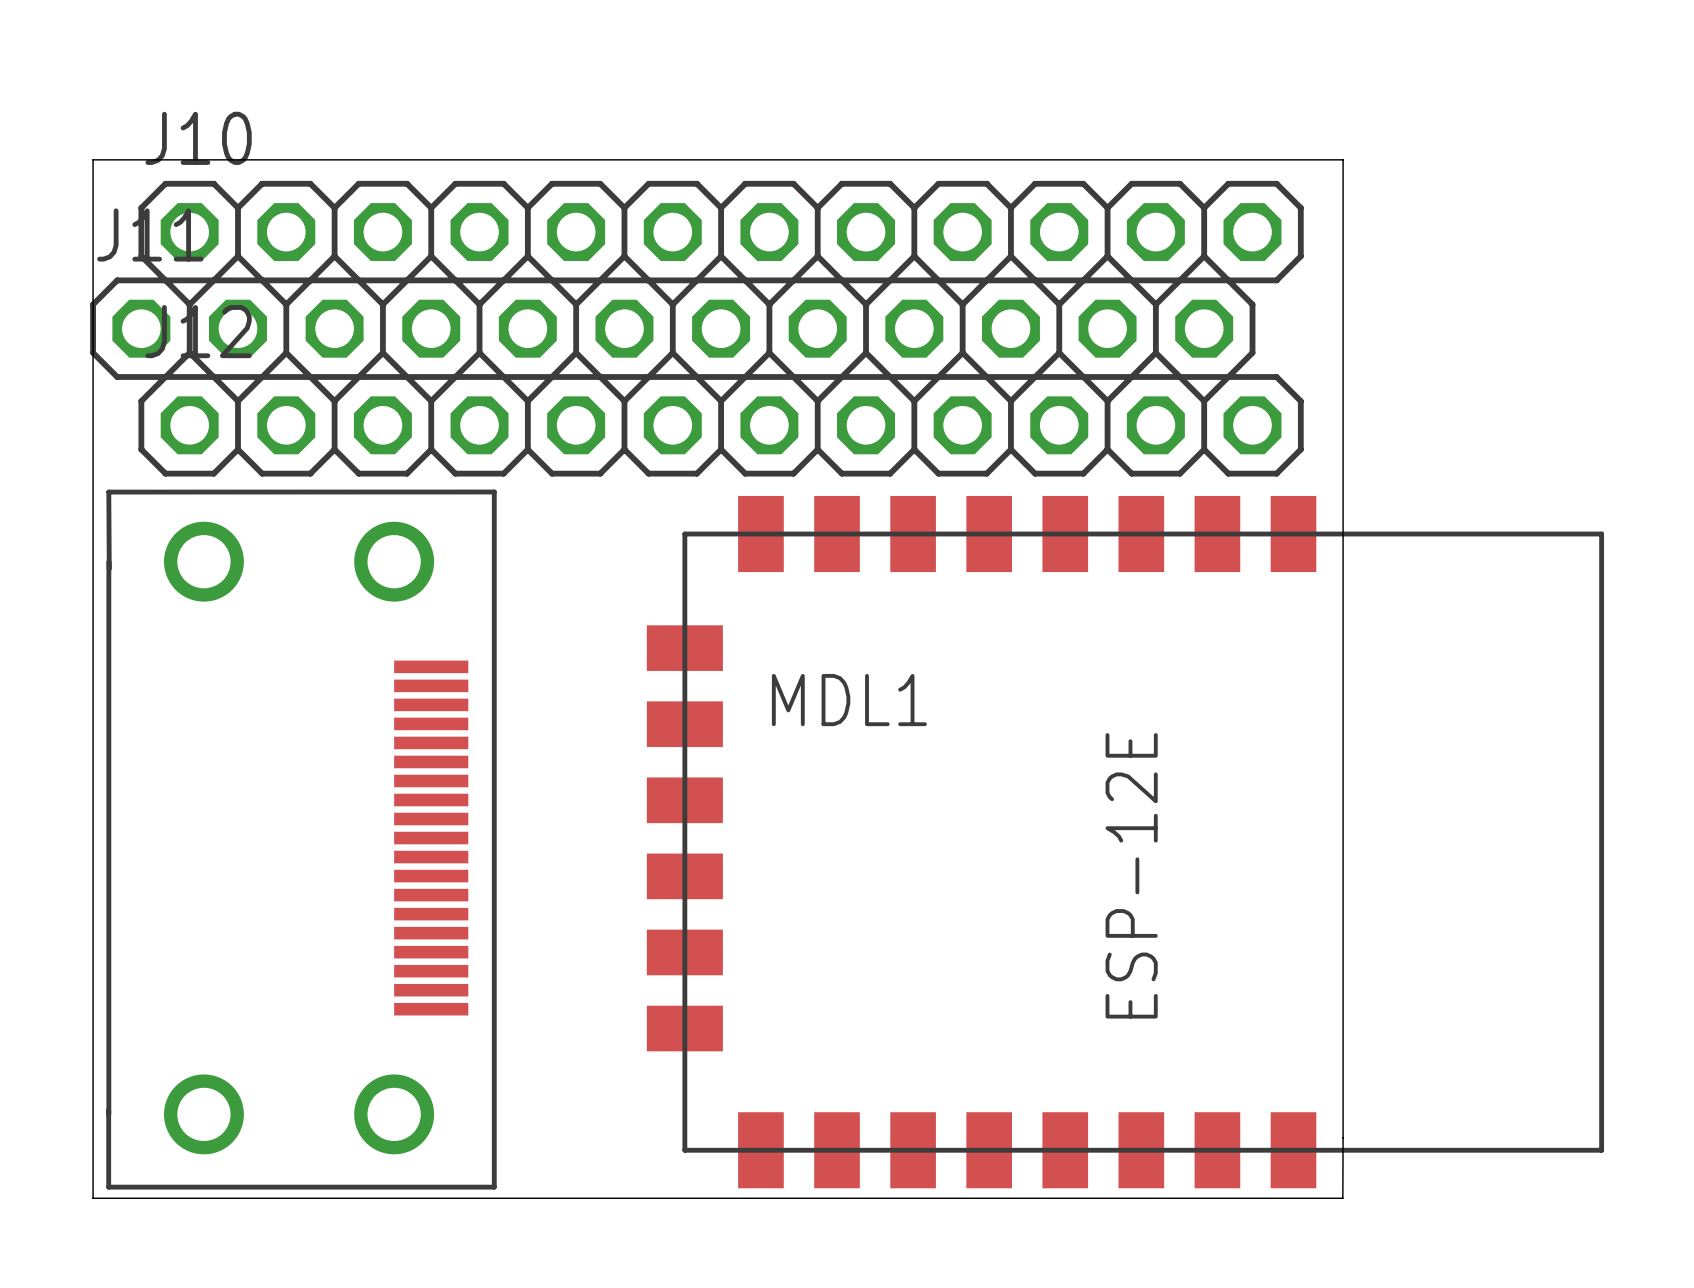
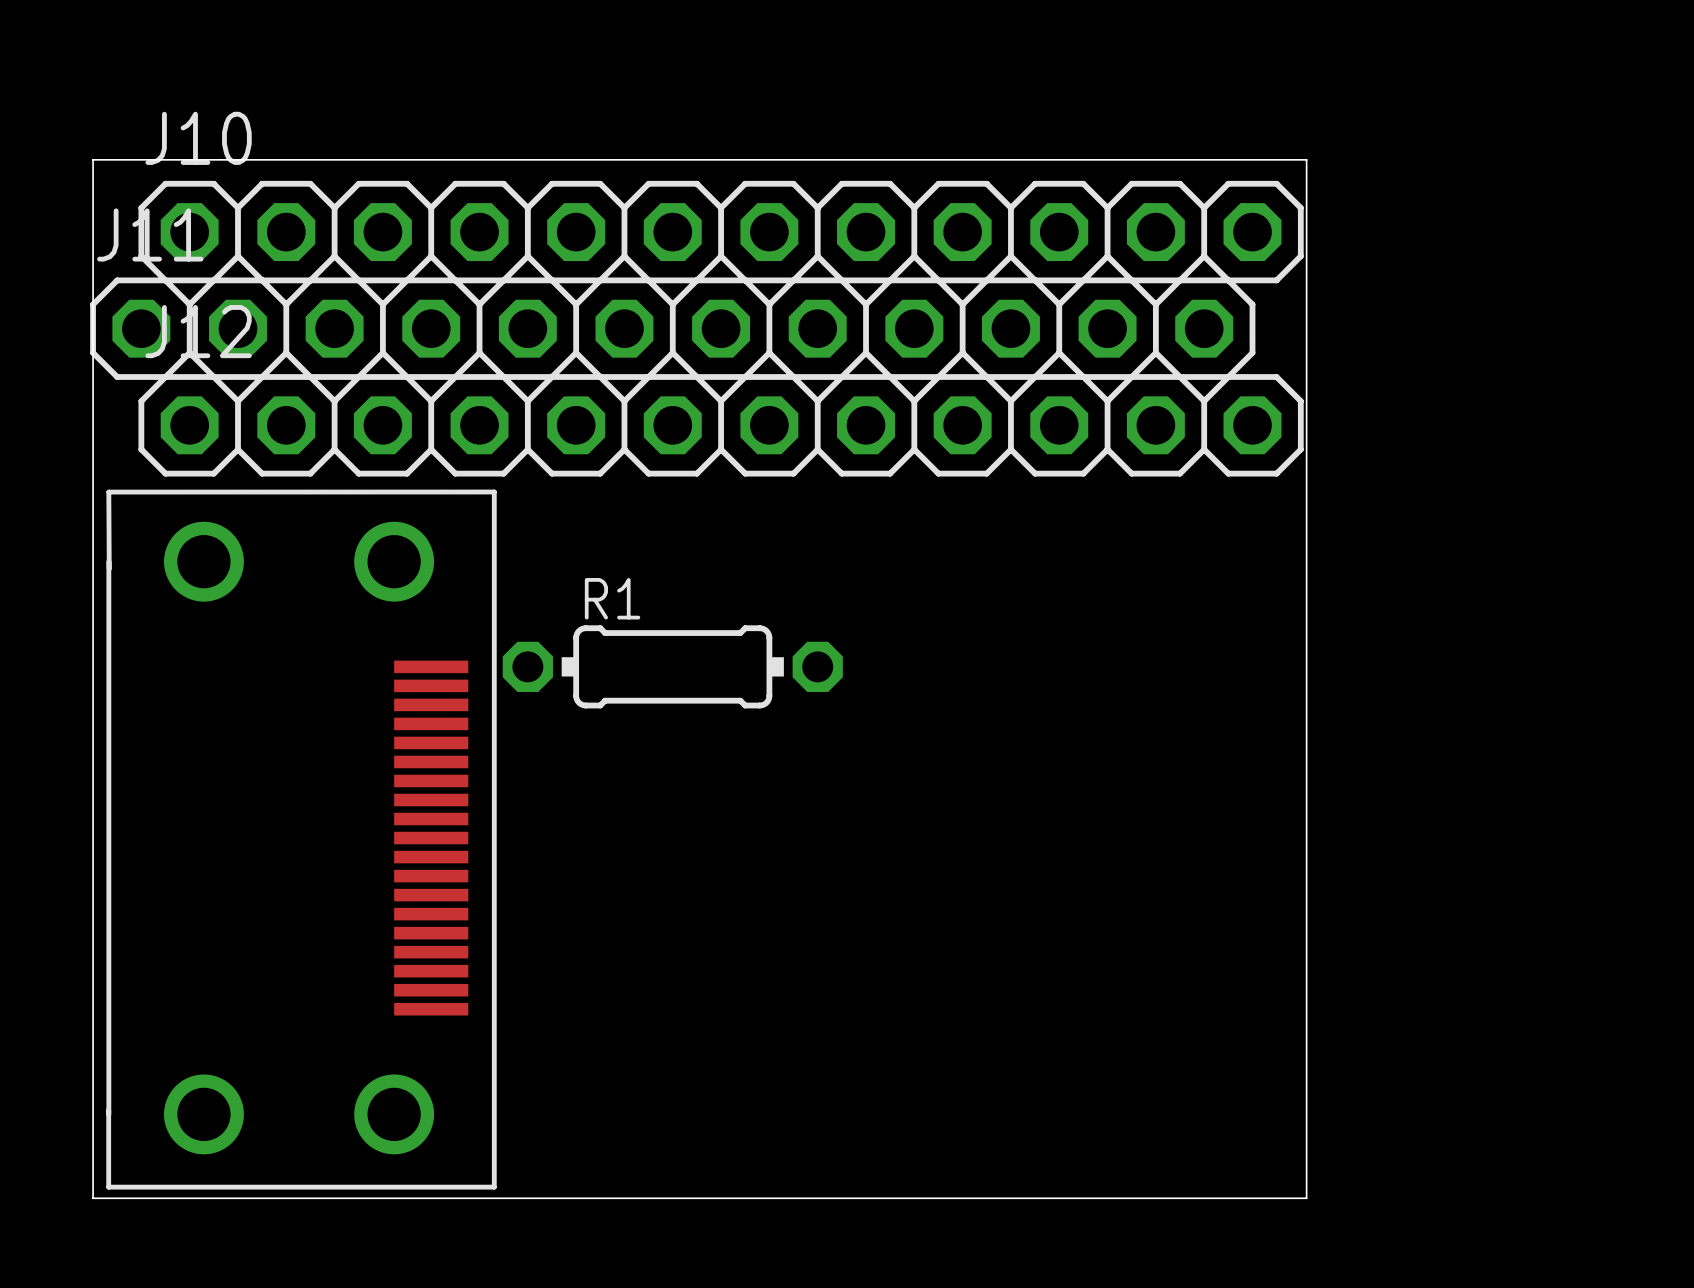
board edge: (1306, 159) (1342, 159) -> none
board edge: (1343, 159) (1342, 1198) (1306, 1198) -> (1306, 159) (1306, 1198)
R1: none -> (672, 666)
MDL1: (1125, 842) -> none

